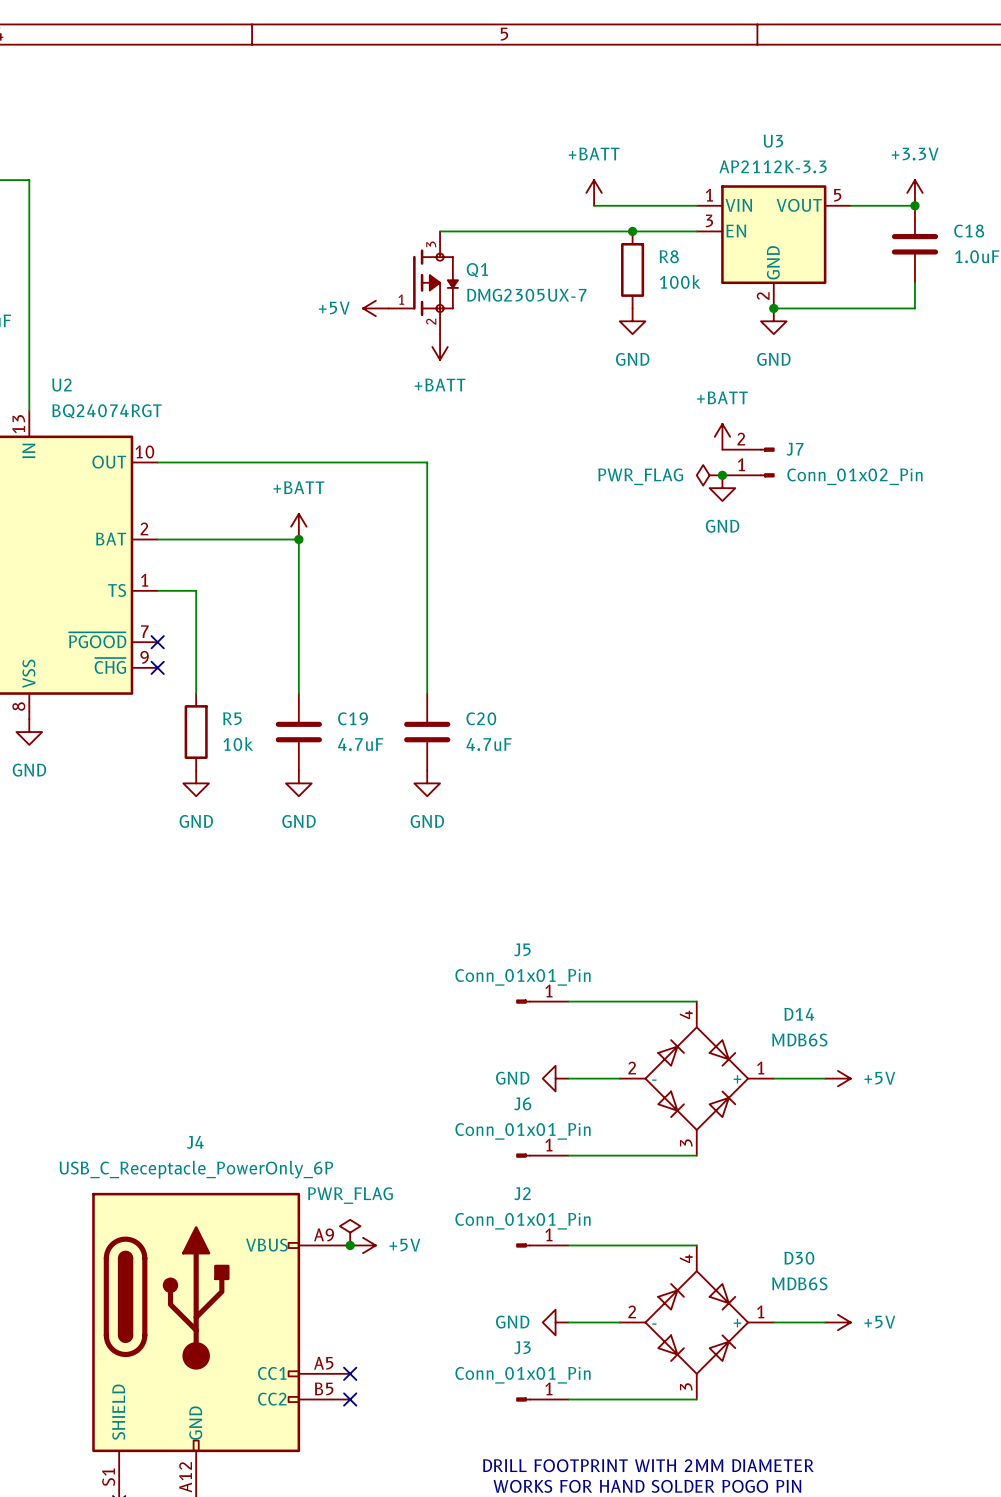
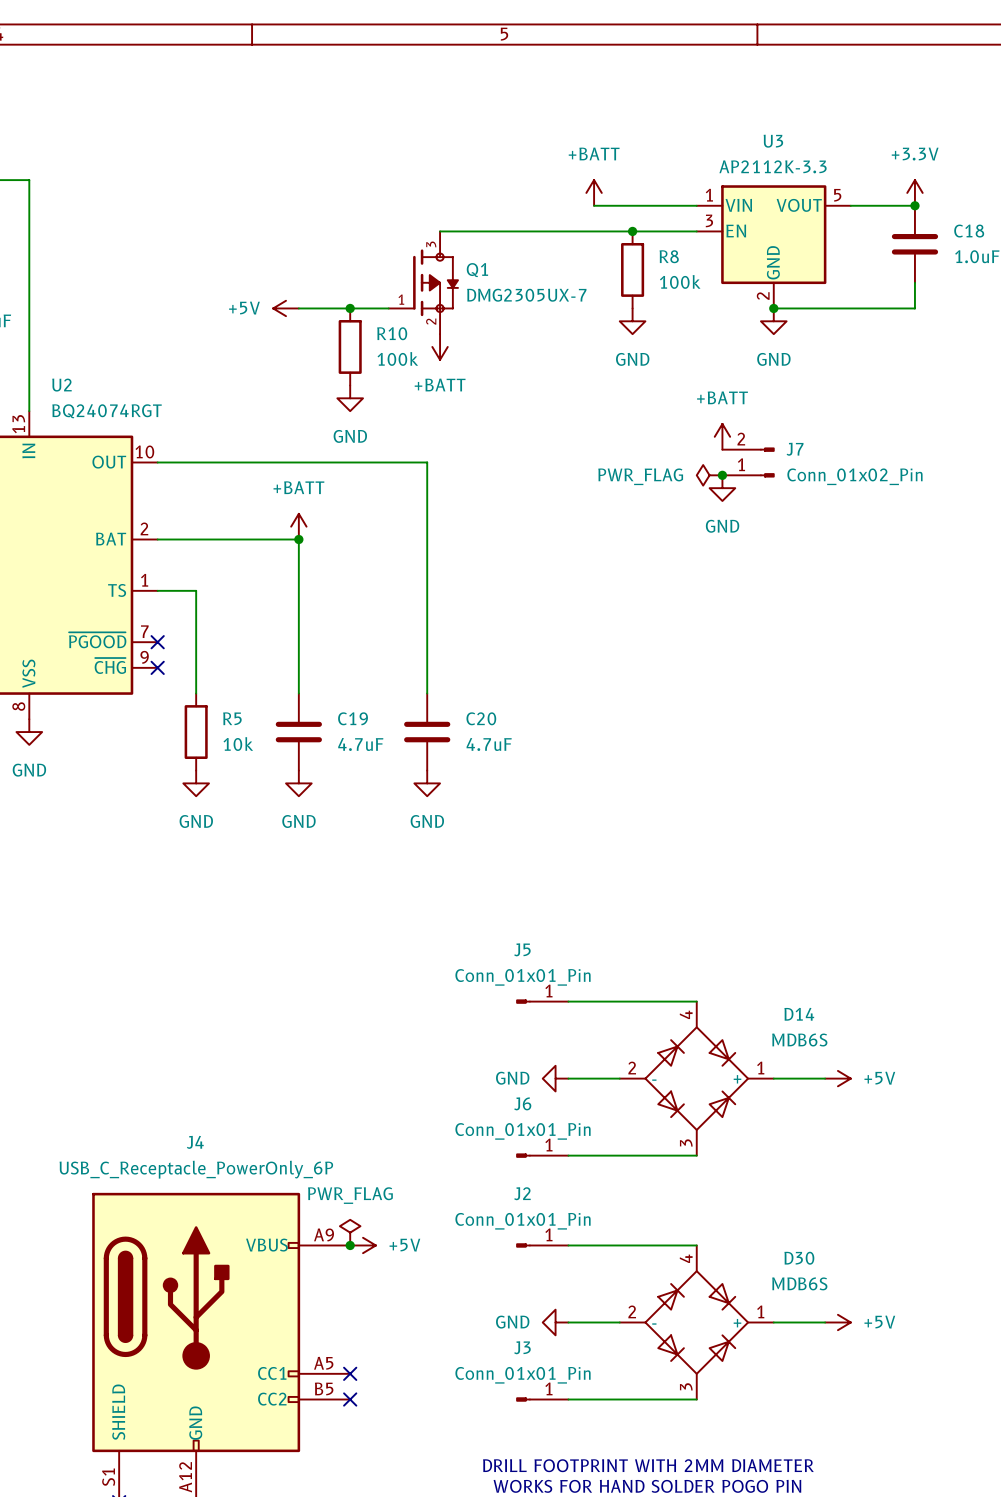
wire: none -> (298, 308) (388, 308)
junction: none -> (350, 308)
power symbol position: +5V (375, 308) -> +5V (286, 308)
R10: none -> 100k (350, 346)
power symbol: none -> GND (350, 398)

